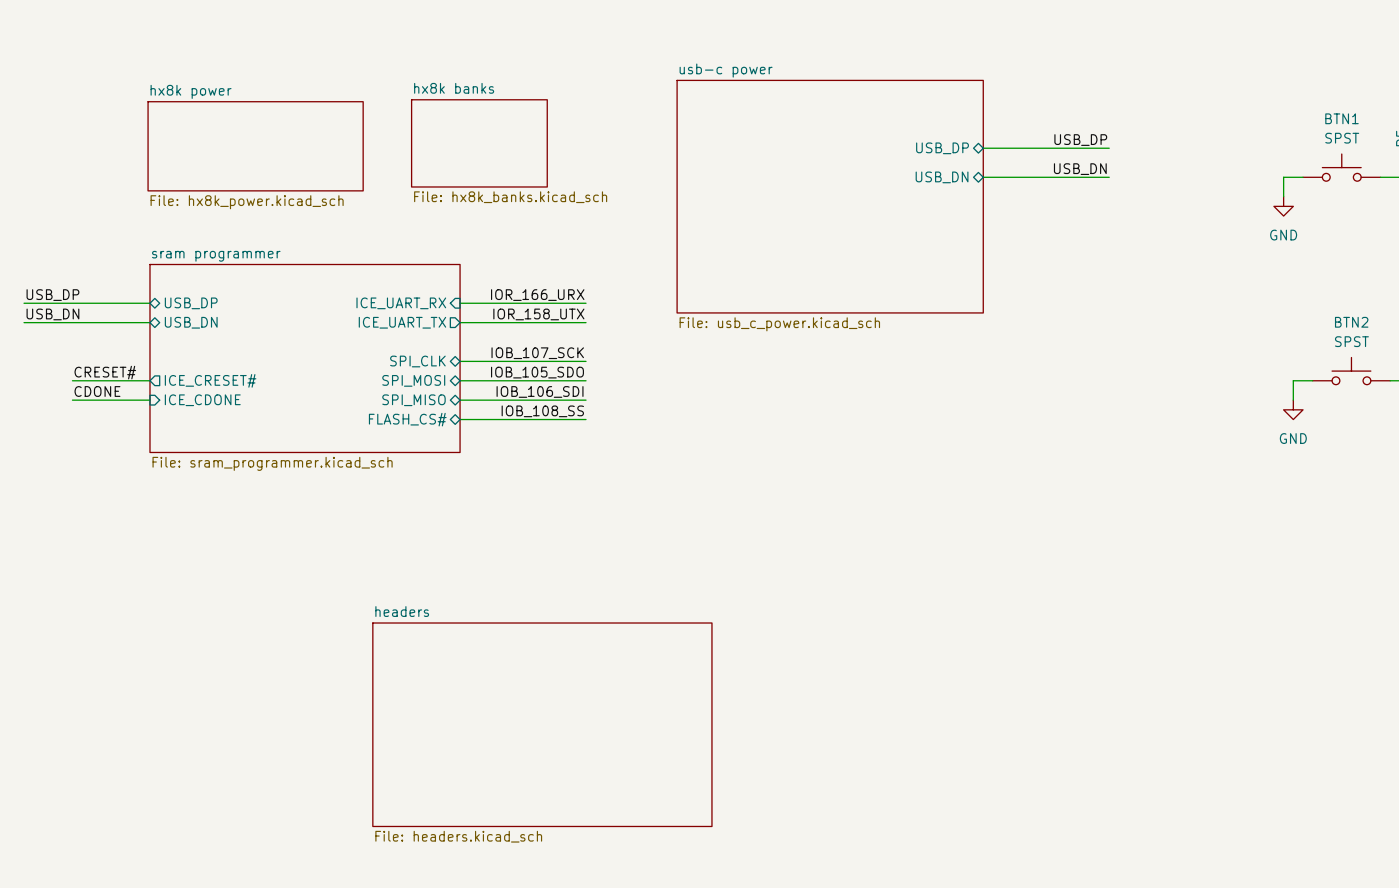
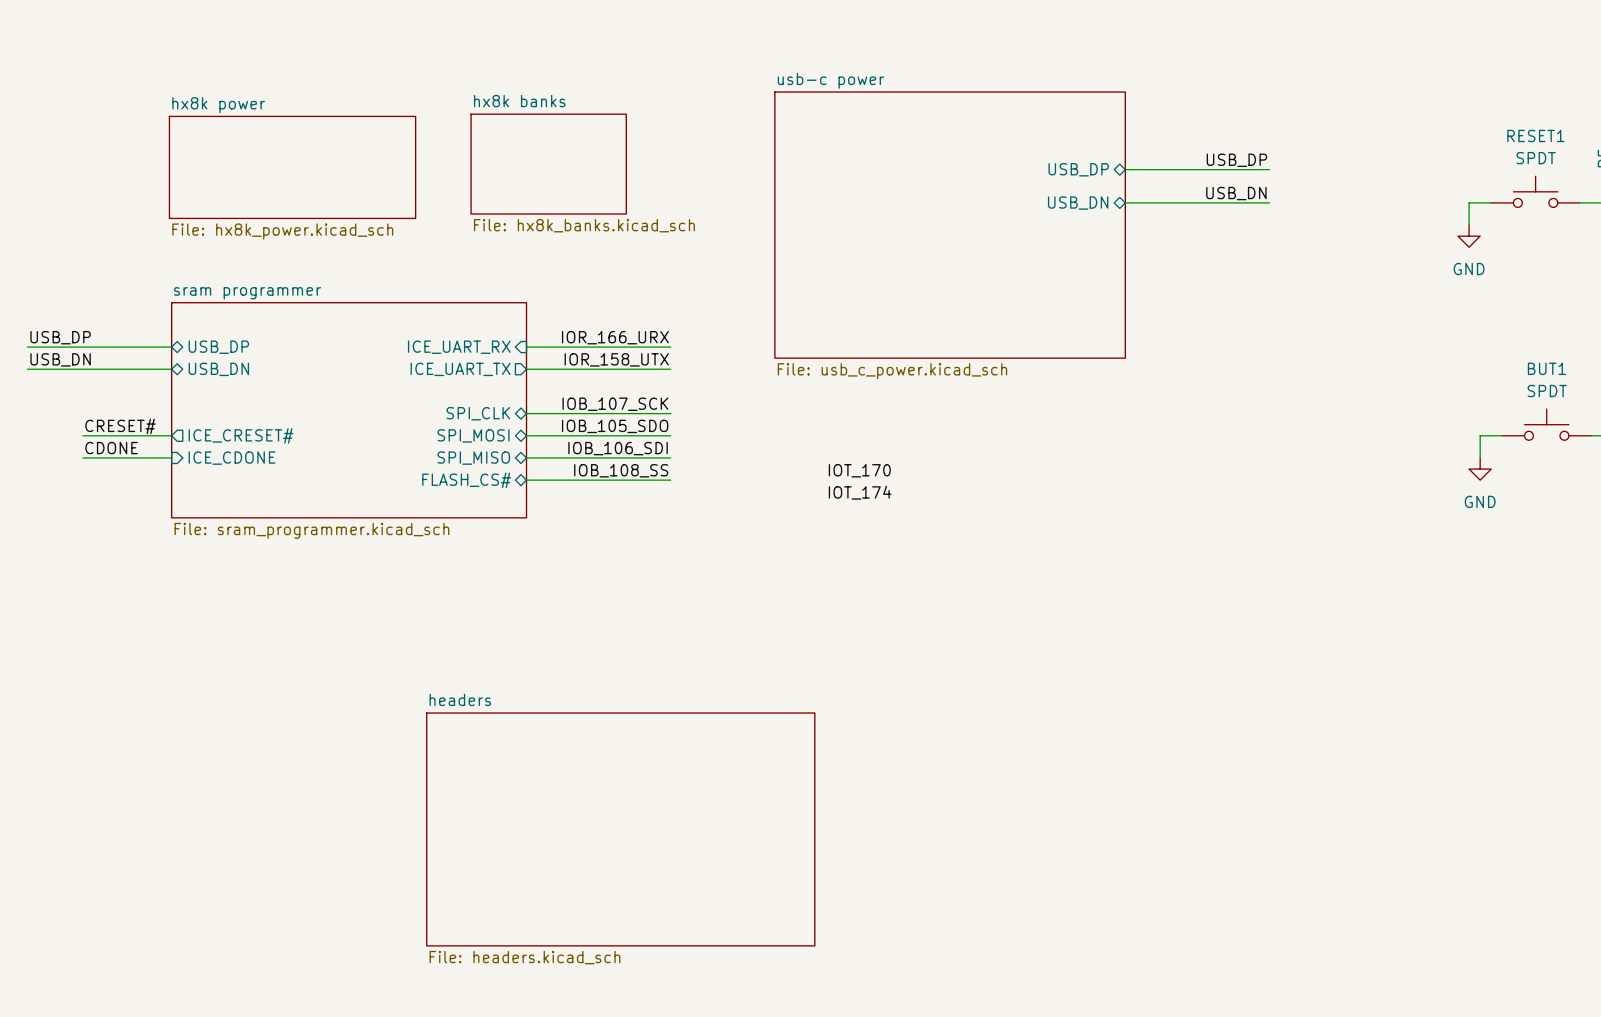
BTN1 name: BTN1 (1342, 118) -> RESET1 (1535, 135)
BTN1 value: SPST (1342, 138) -> SPDT (1536, 158)
BTN2 name: BTN2 (1351, 322) -> BUT1 (1546, 368)
BTN2 value: SPST (1351, 341) -> SPDT (1547, 391)
label: none -> IOT_170 (859, 470)
label: none -> IOT_174 (860, 492)

